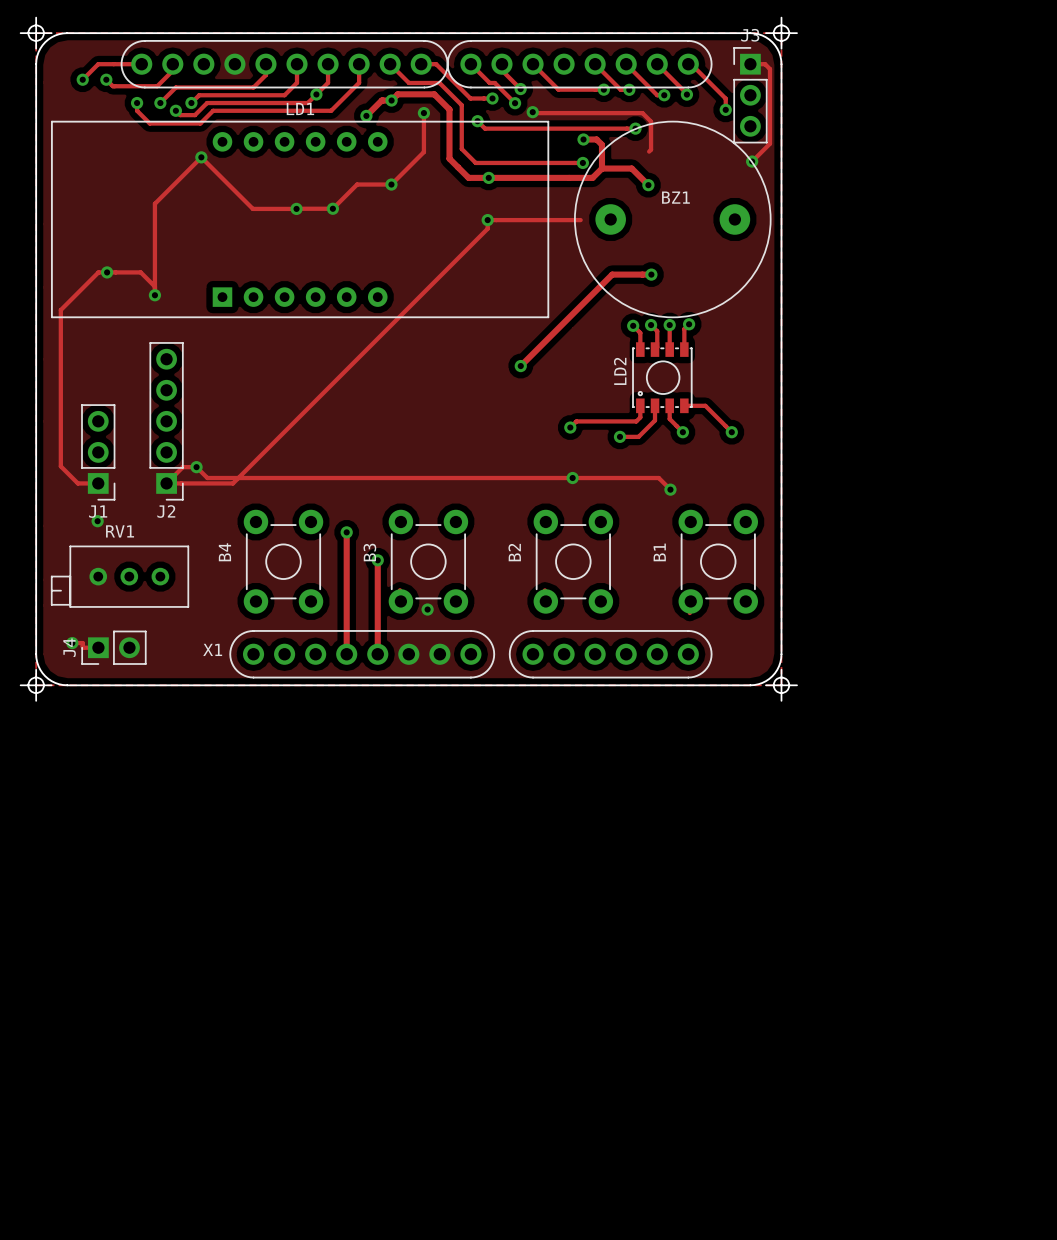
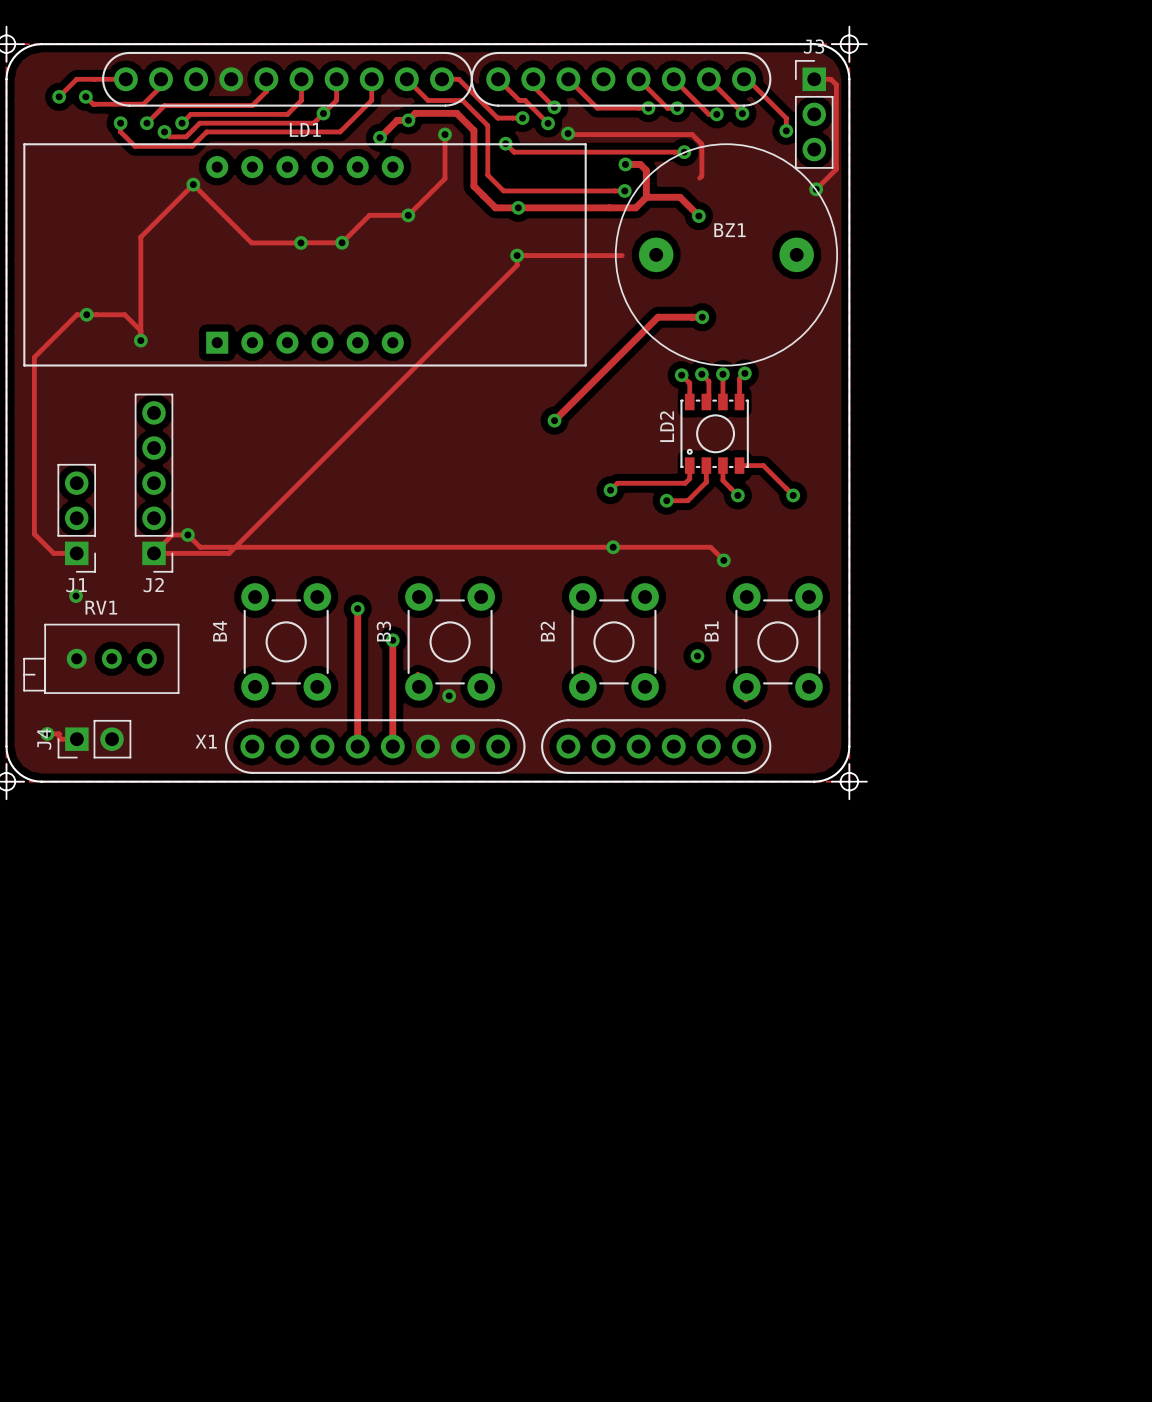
via: none -> (697, 656)

